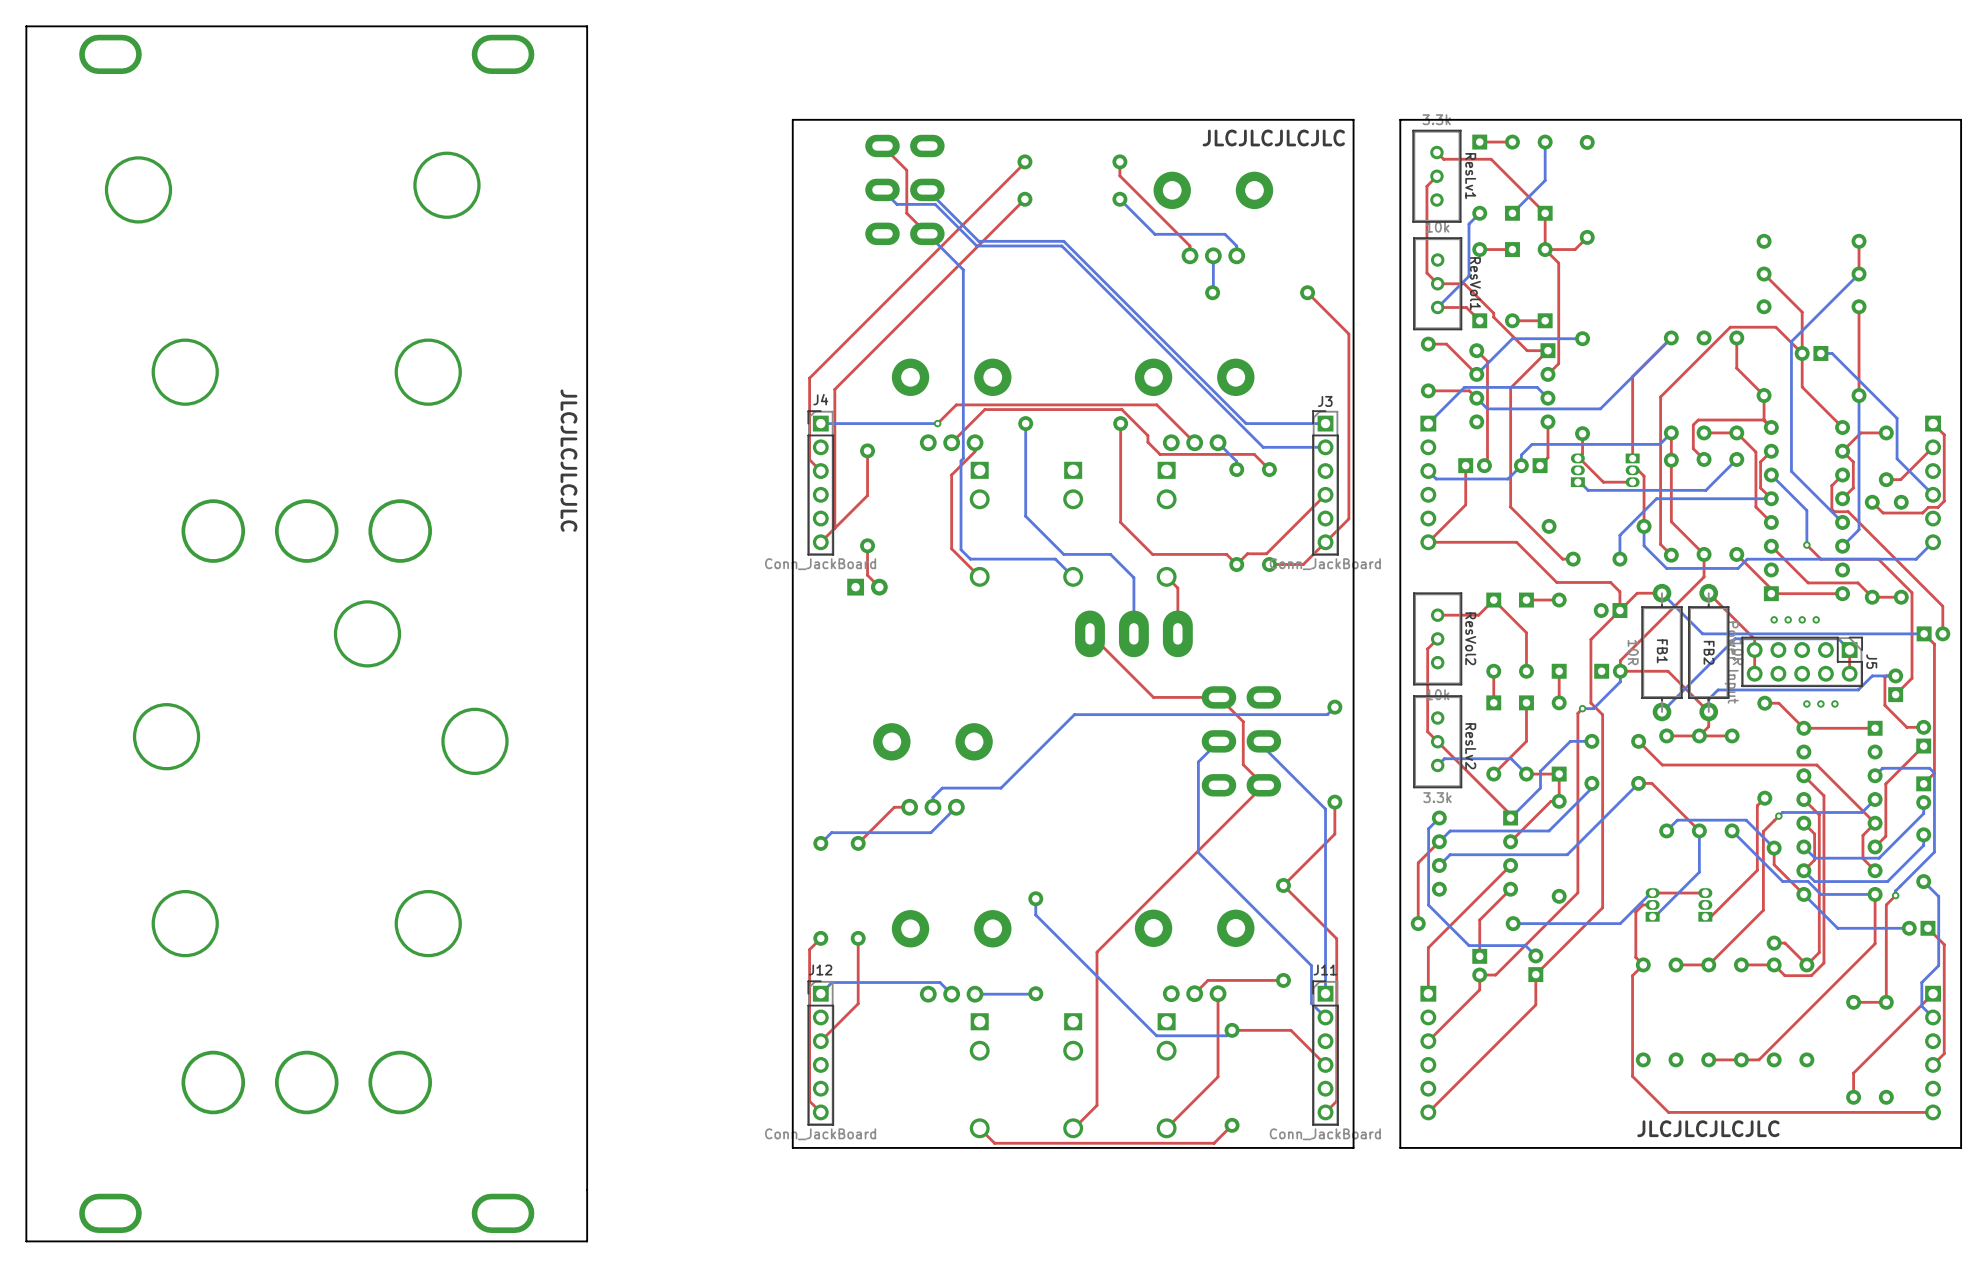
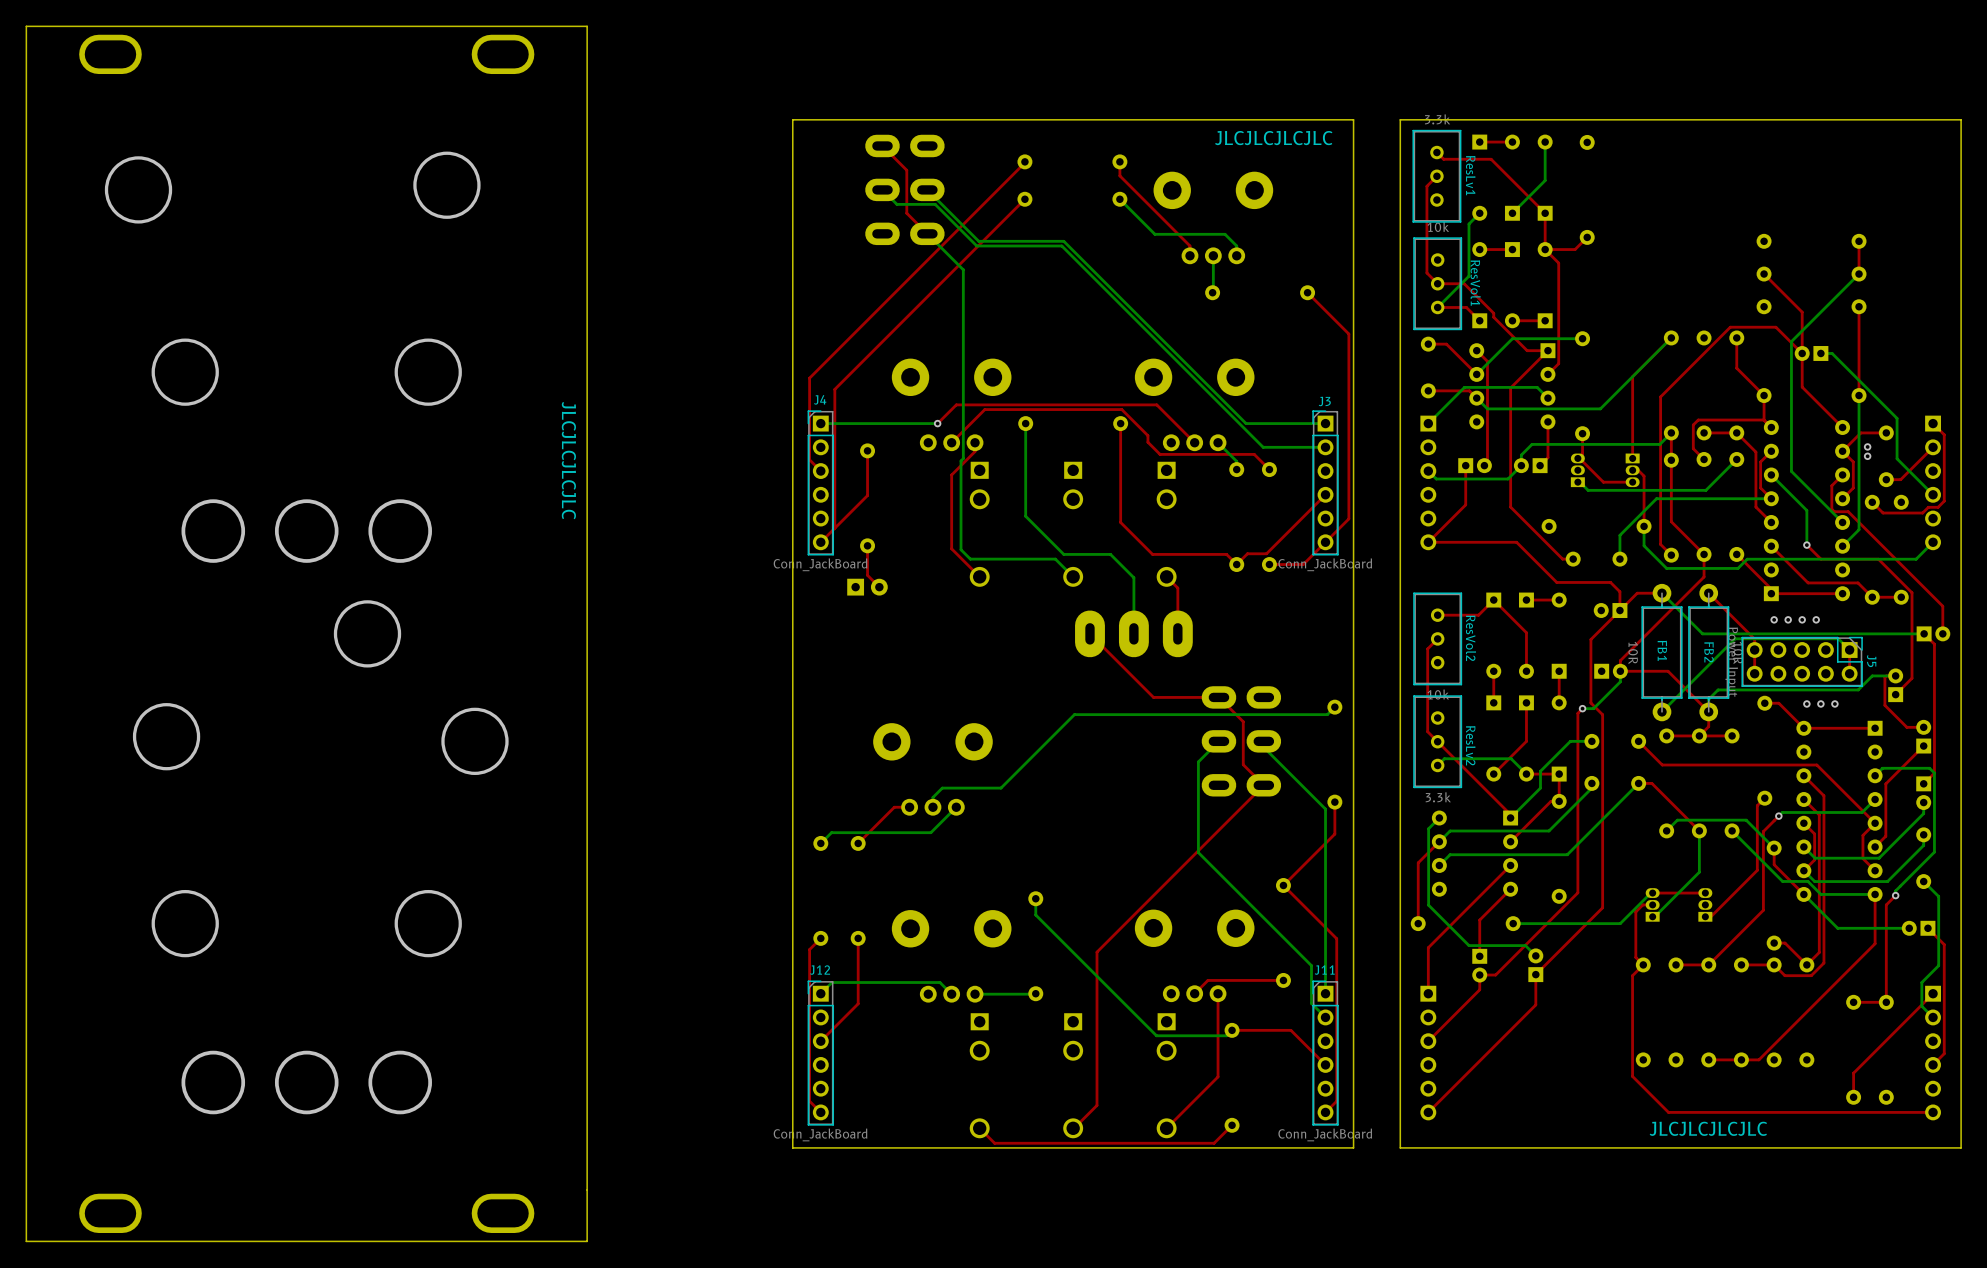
via: none -> (1867, 446)
via: none -> (1867, 456)

